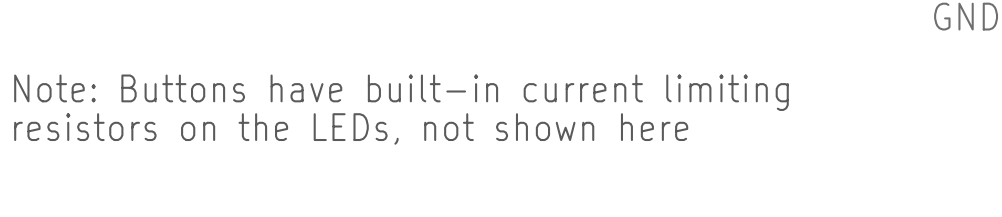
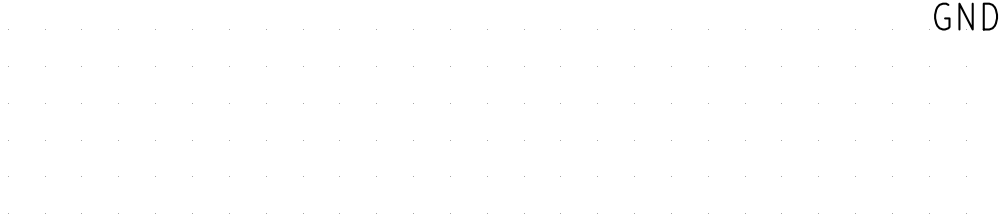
text: Note: Buttons have built-in current limiting (401, 92) -> none
text: resistors on the LEDs, not shown here (351, 128) -> none

